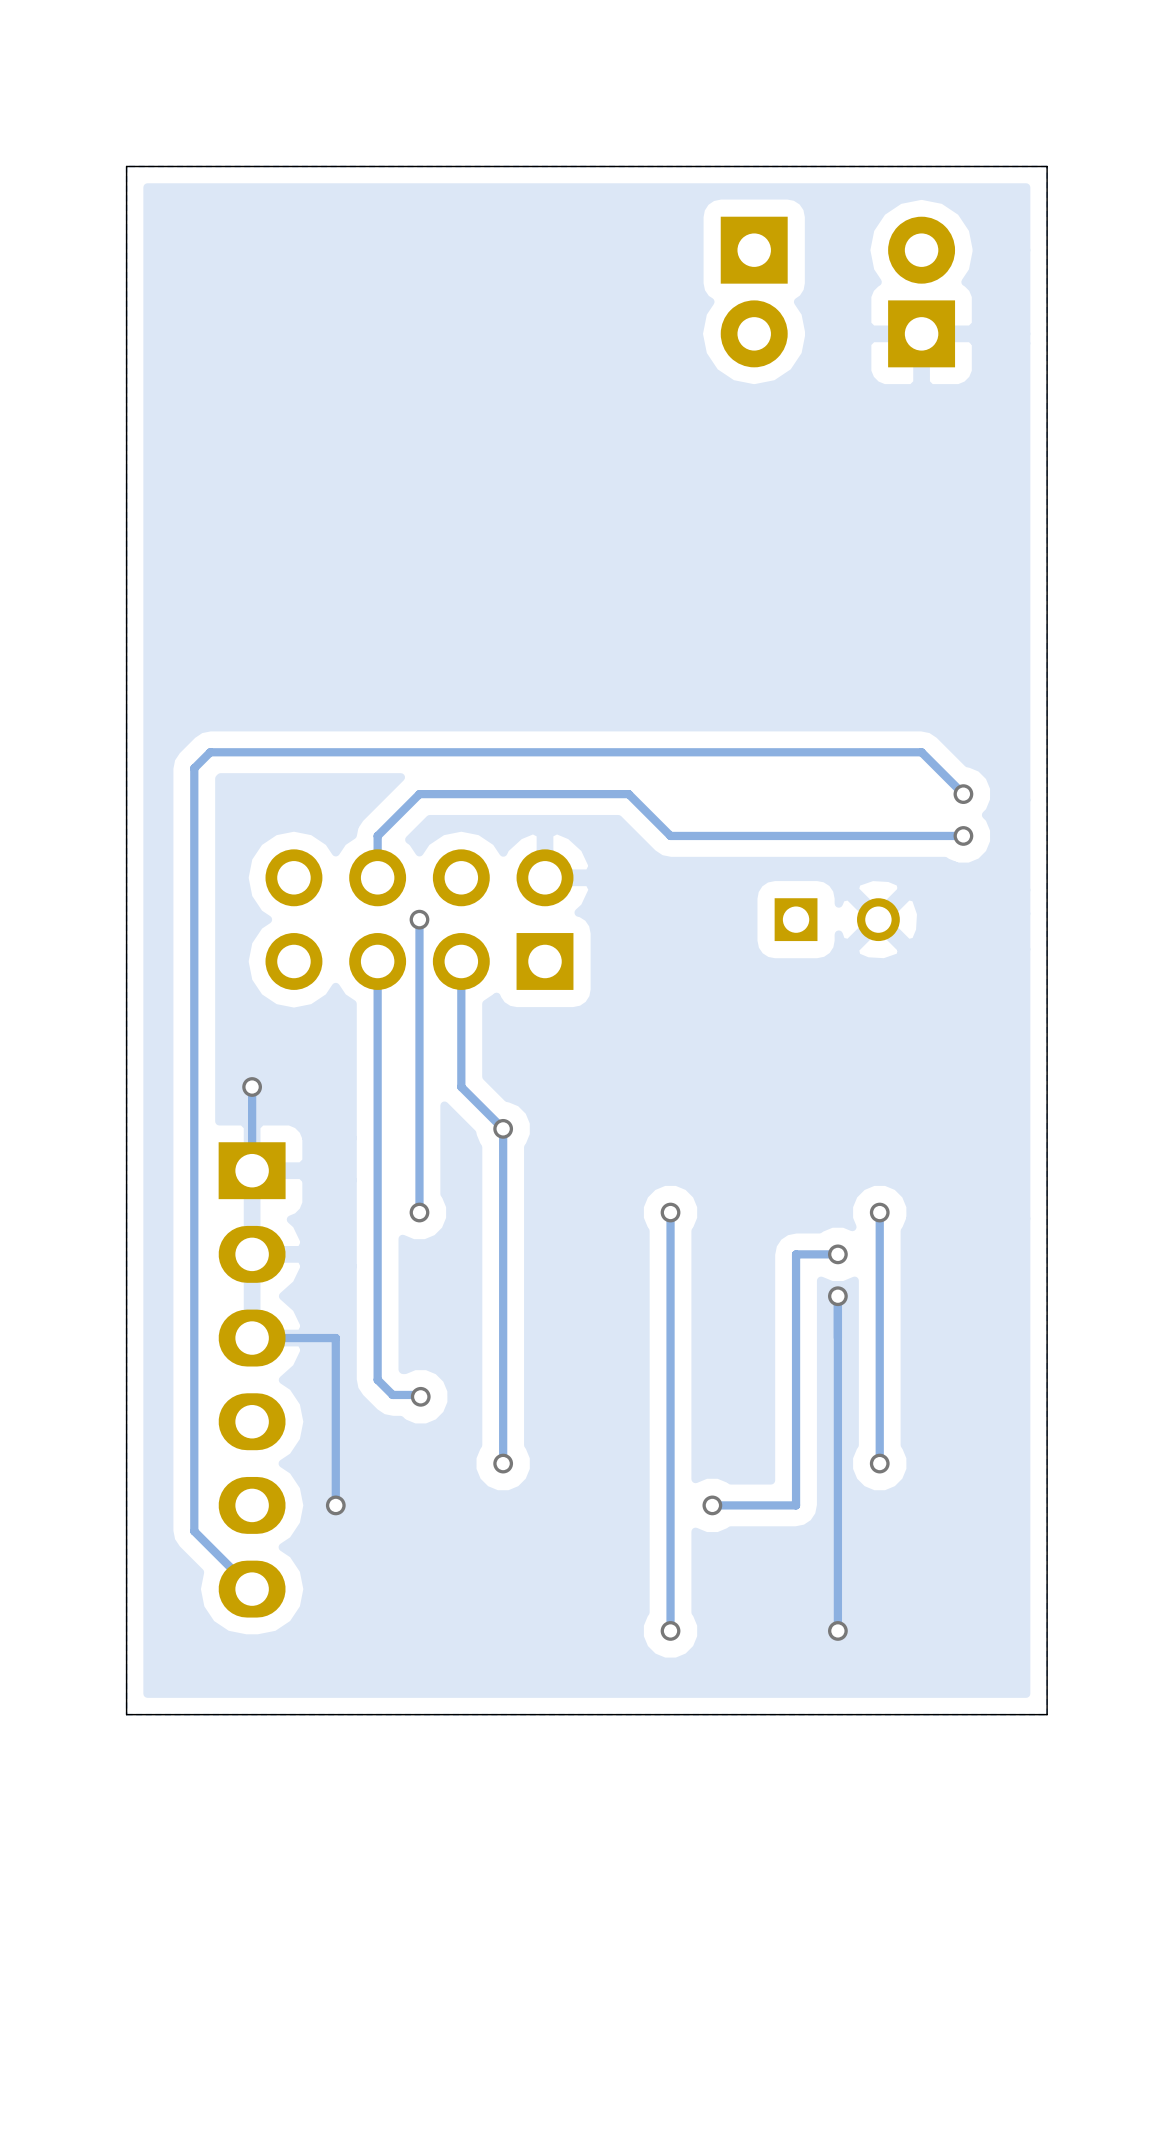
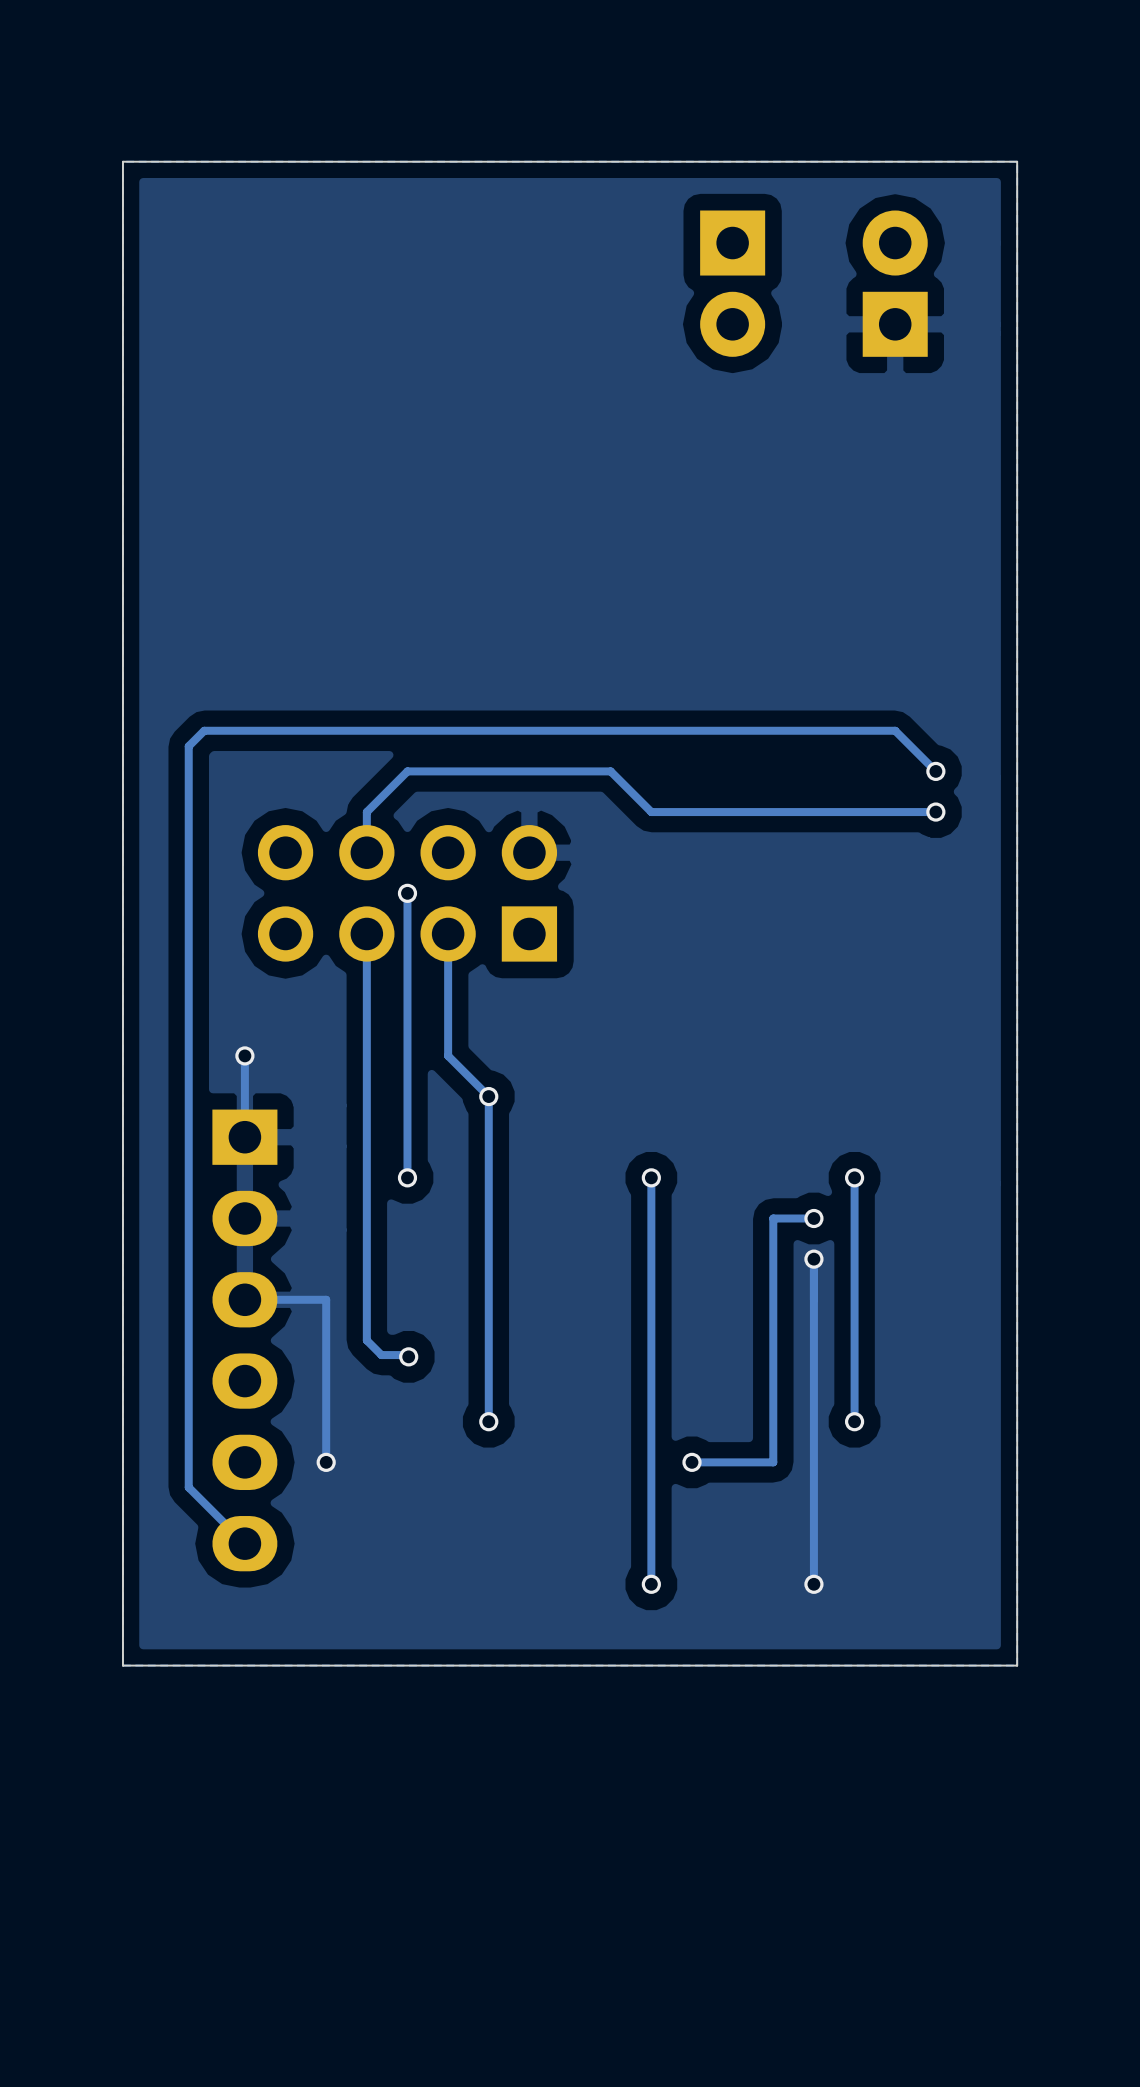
part: (837, 919) -> none

